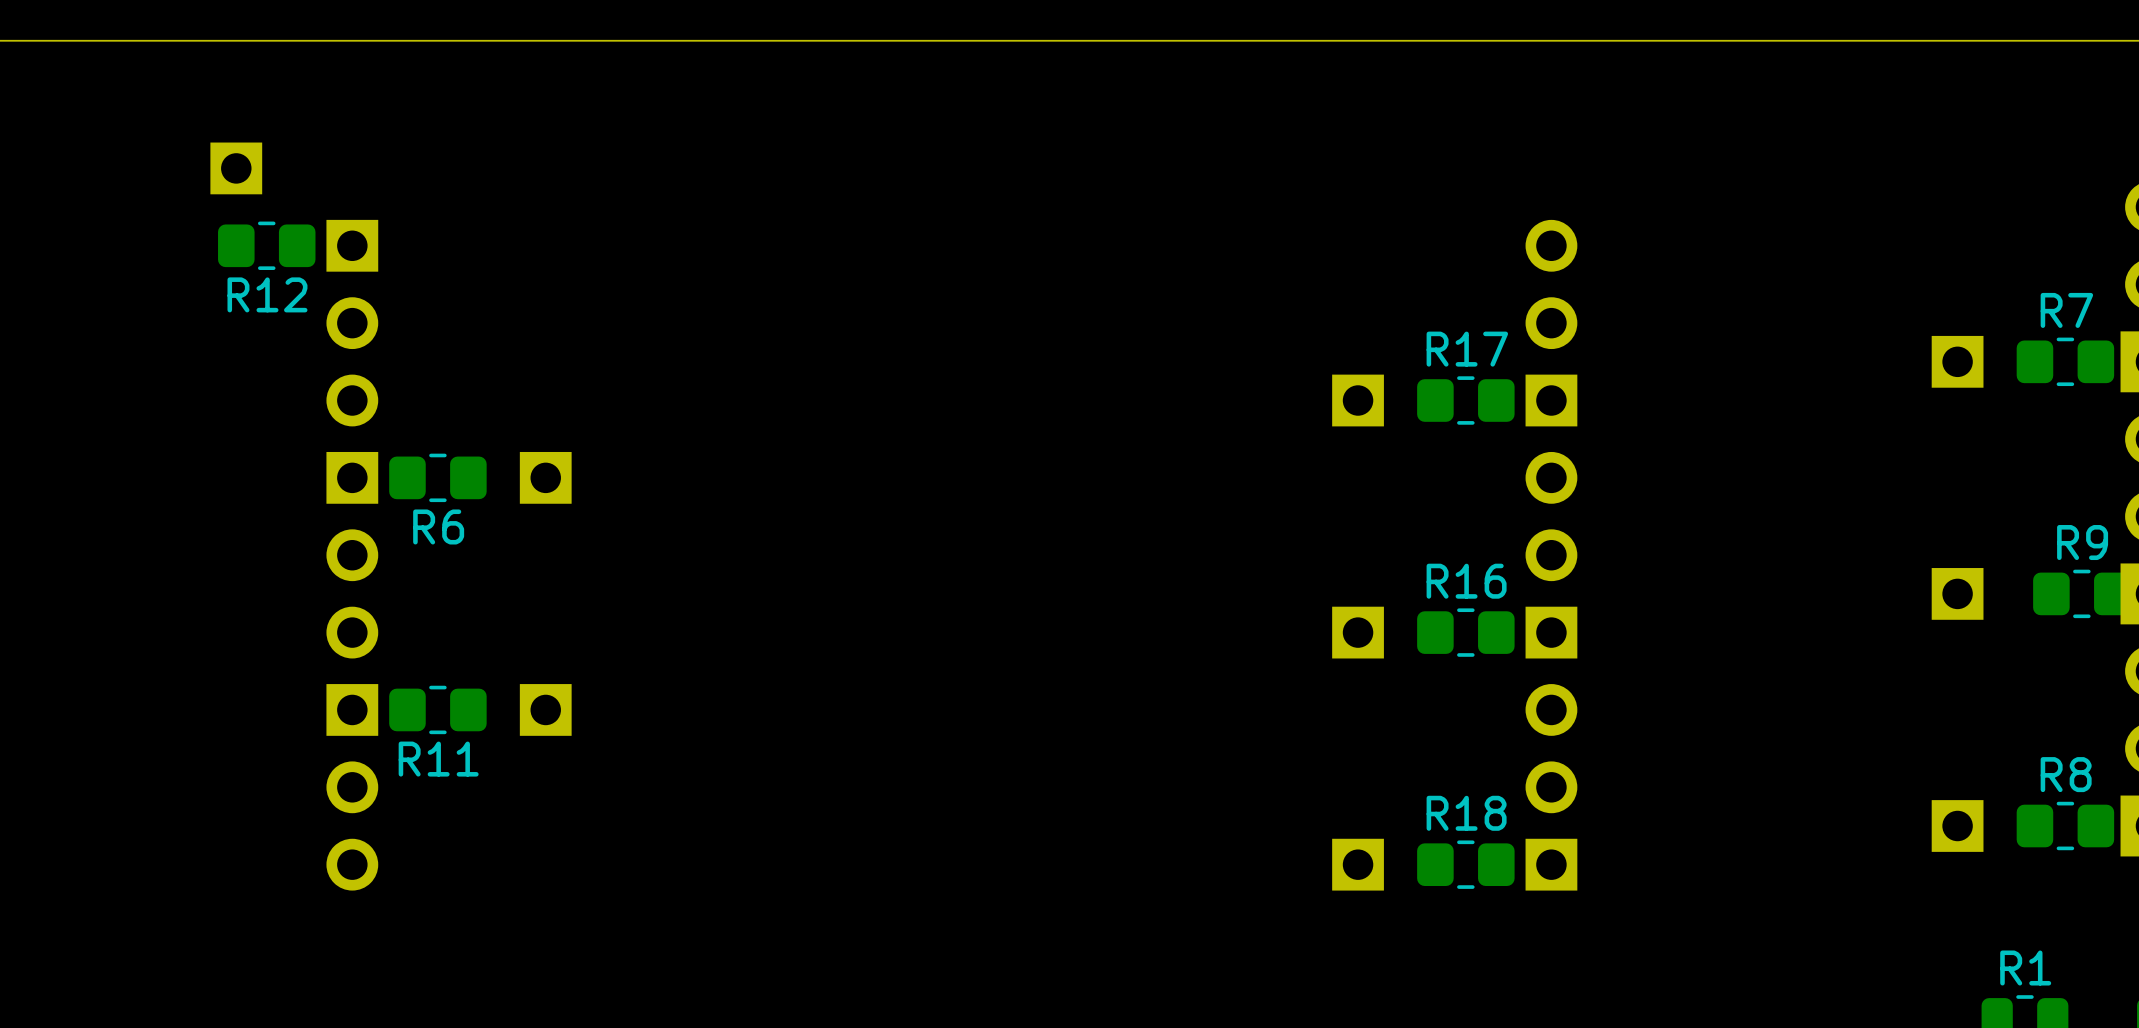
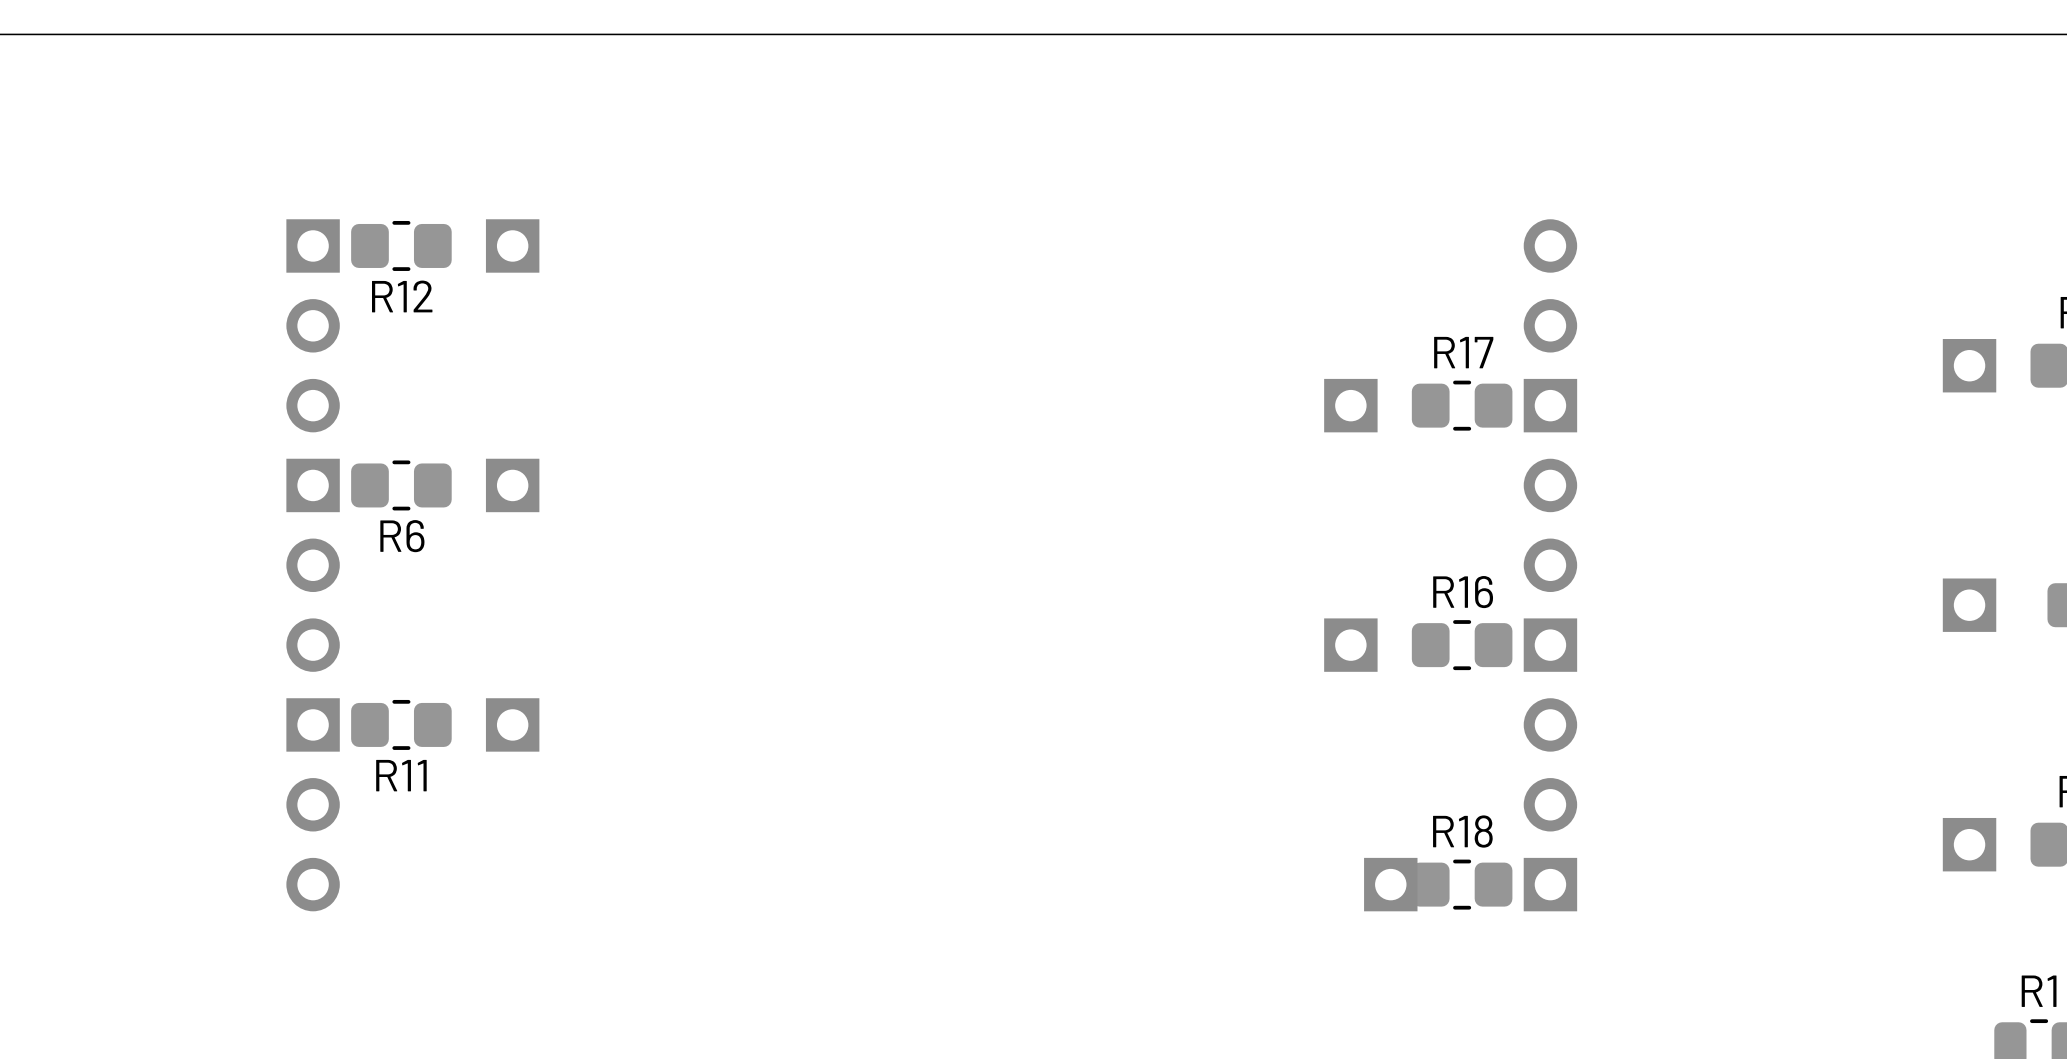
part position: (236, 168) -> (512, 245)
R12 position: (266, 245) -> (401, 245)
part position: (1358, 864) -> (1390, 884)

